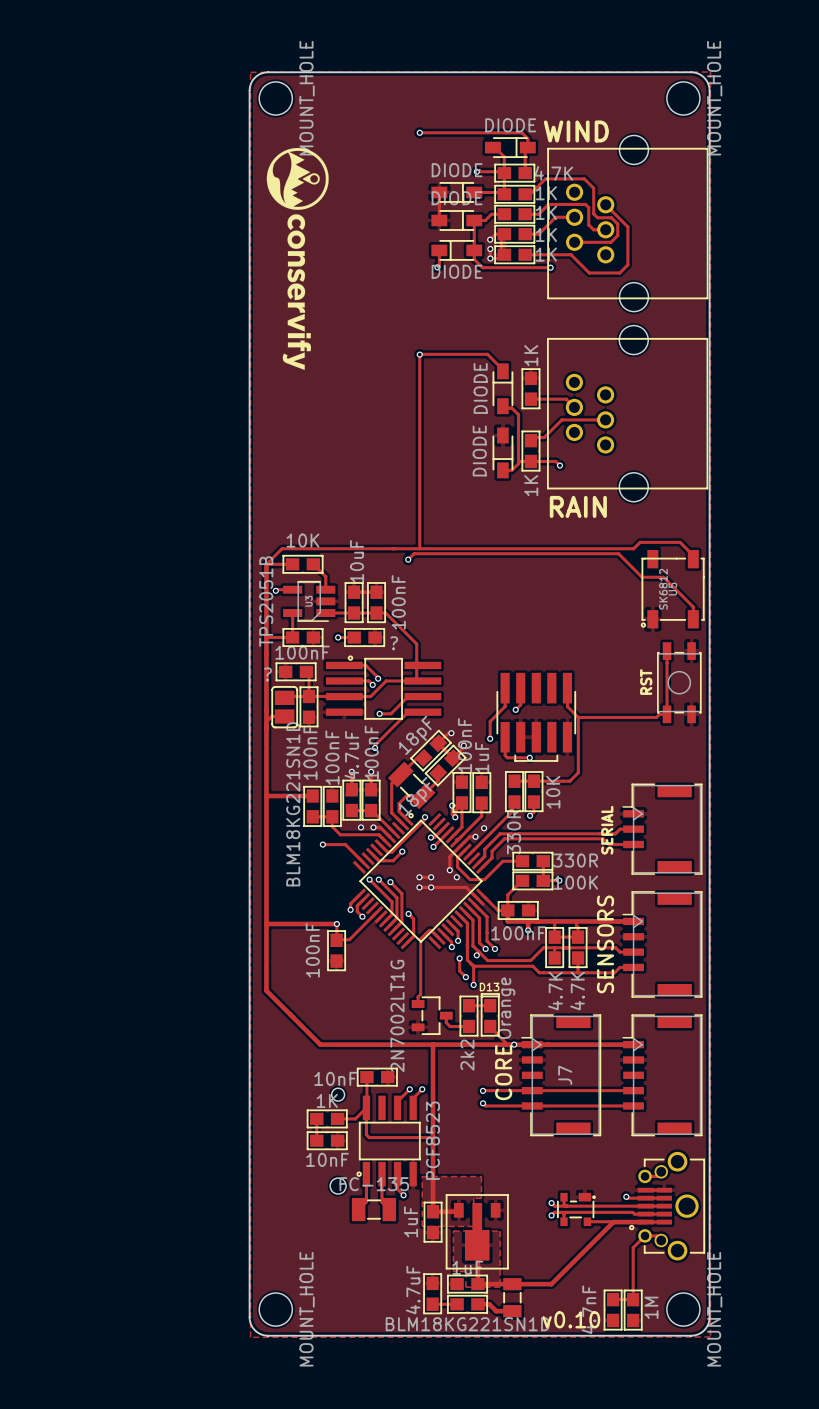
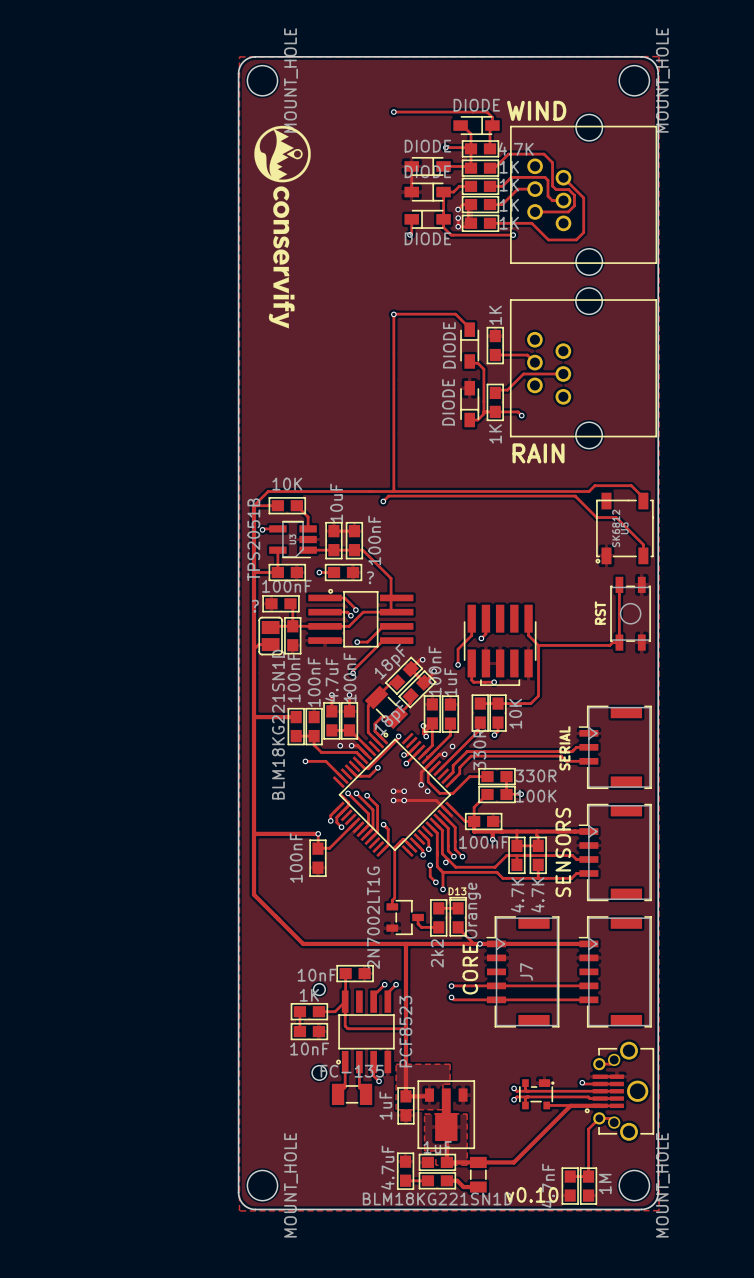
track: none -> (341, 795) (348, 802) (348, 805) (342, 811)

